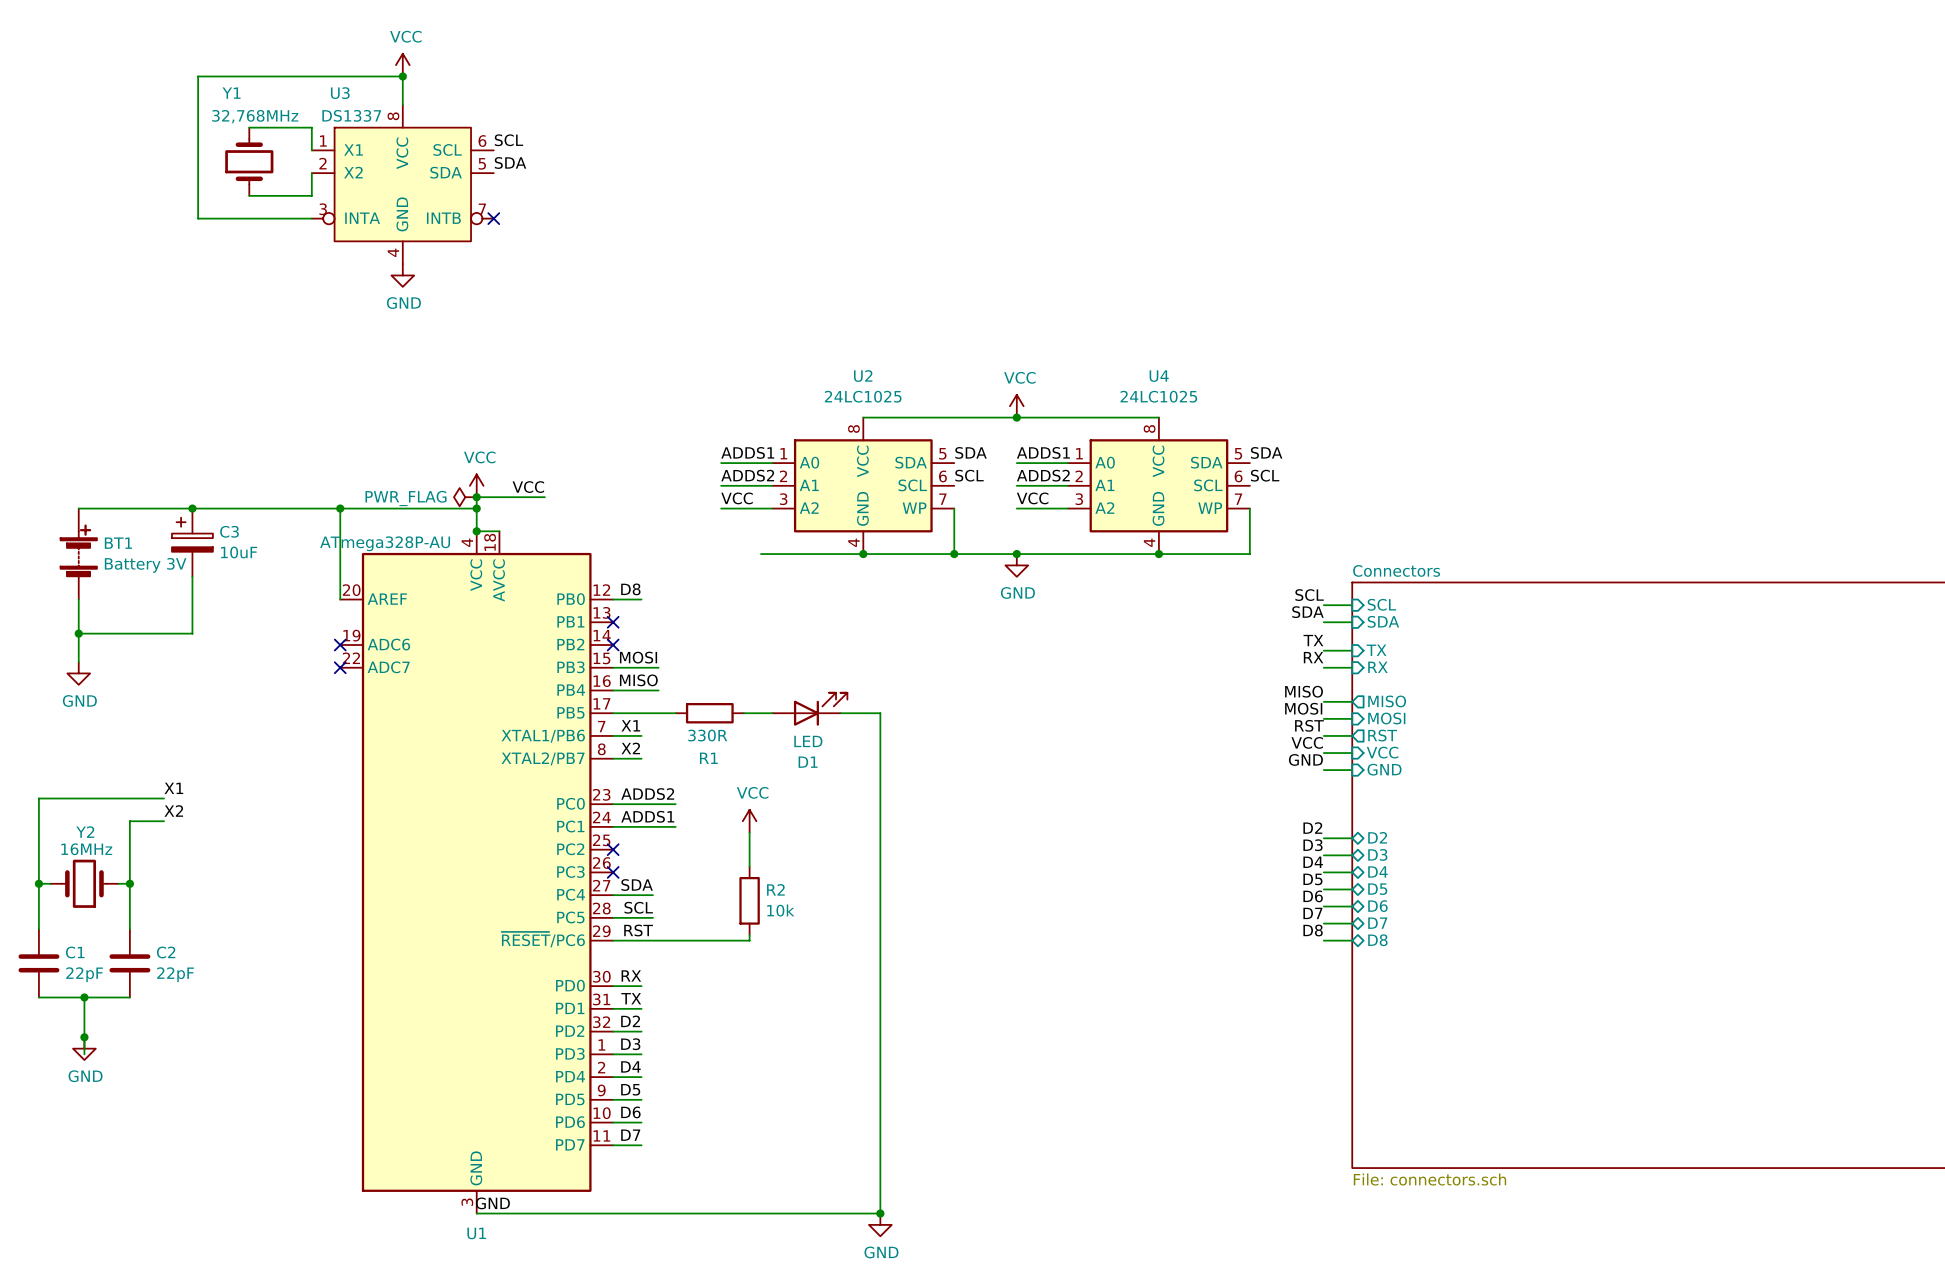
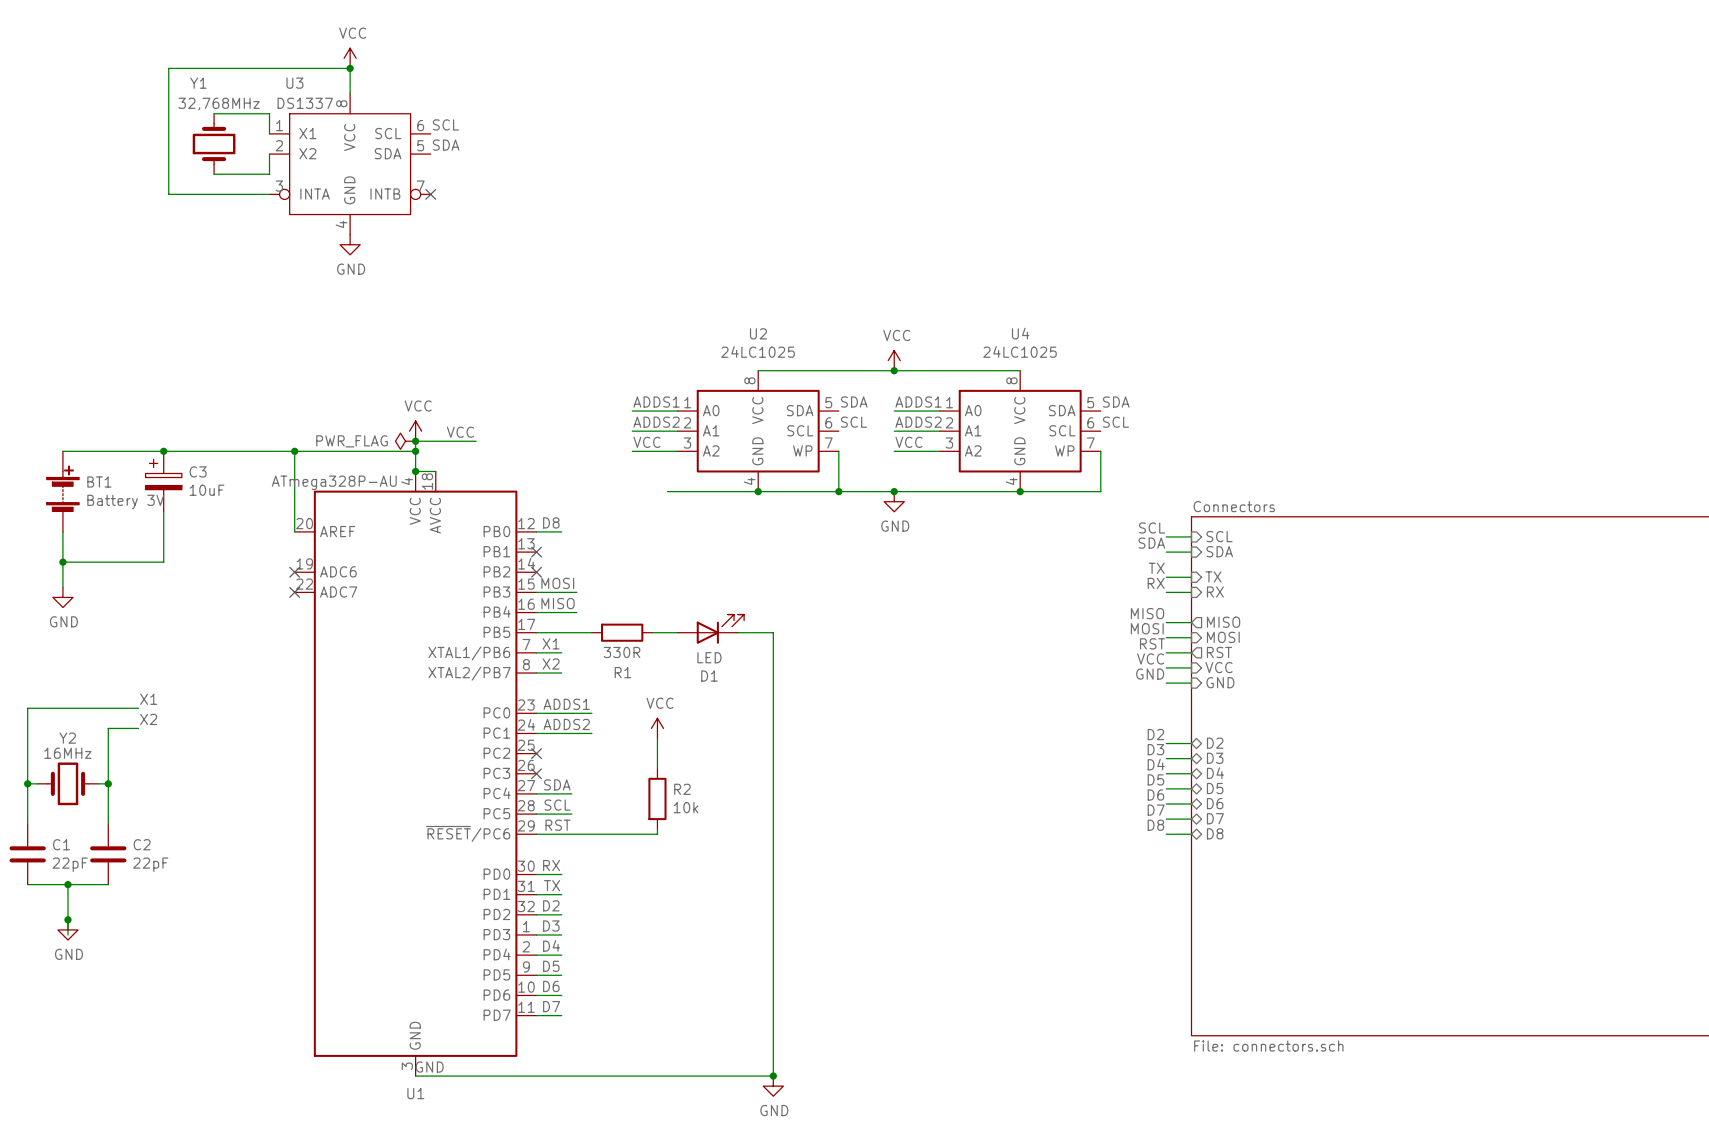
label: ADDS2 (647, 794) -> ADDS1 (566, 704)
label: ADDS1 (647, 816) -> ADDS2 (566, 724)

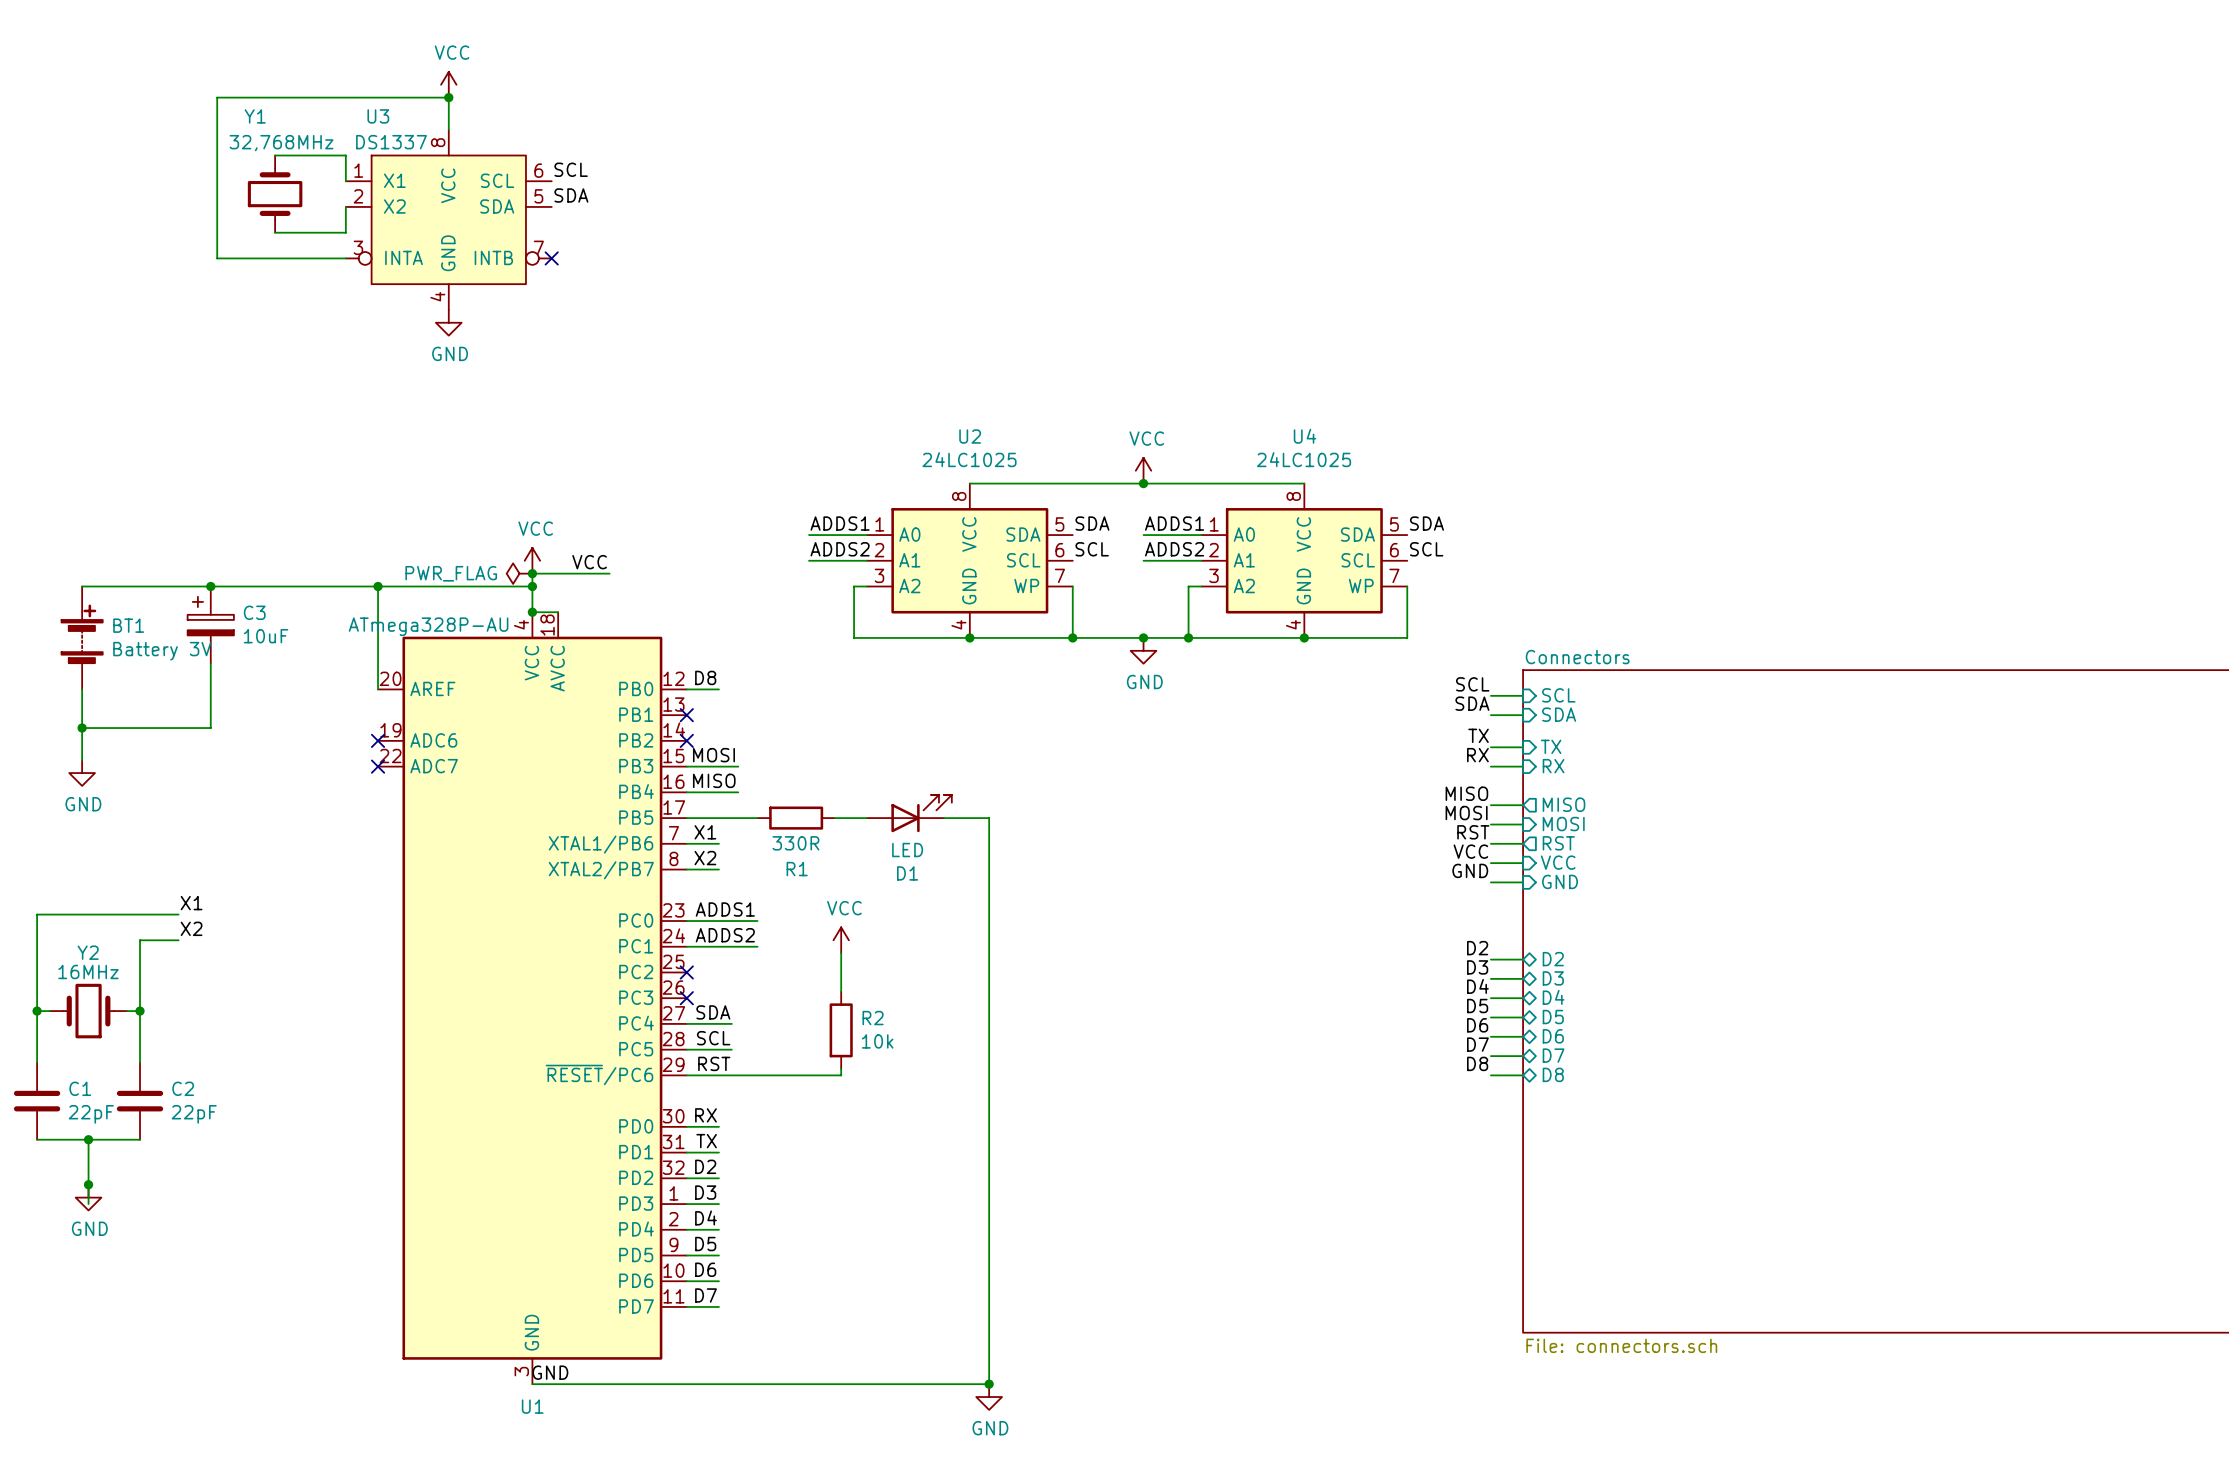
label: VCC (646, 442) -> none
label: VCC (908, 442) -> none
wire: (632, 451) (667, 451) -> (854, 637) (854, 586)
wire: (894, 451) (929, 451) -> (1188, 637) (1188, 586)
junction: none -> (1188, 637)

